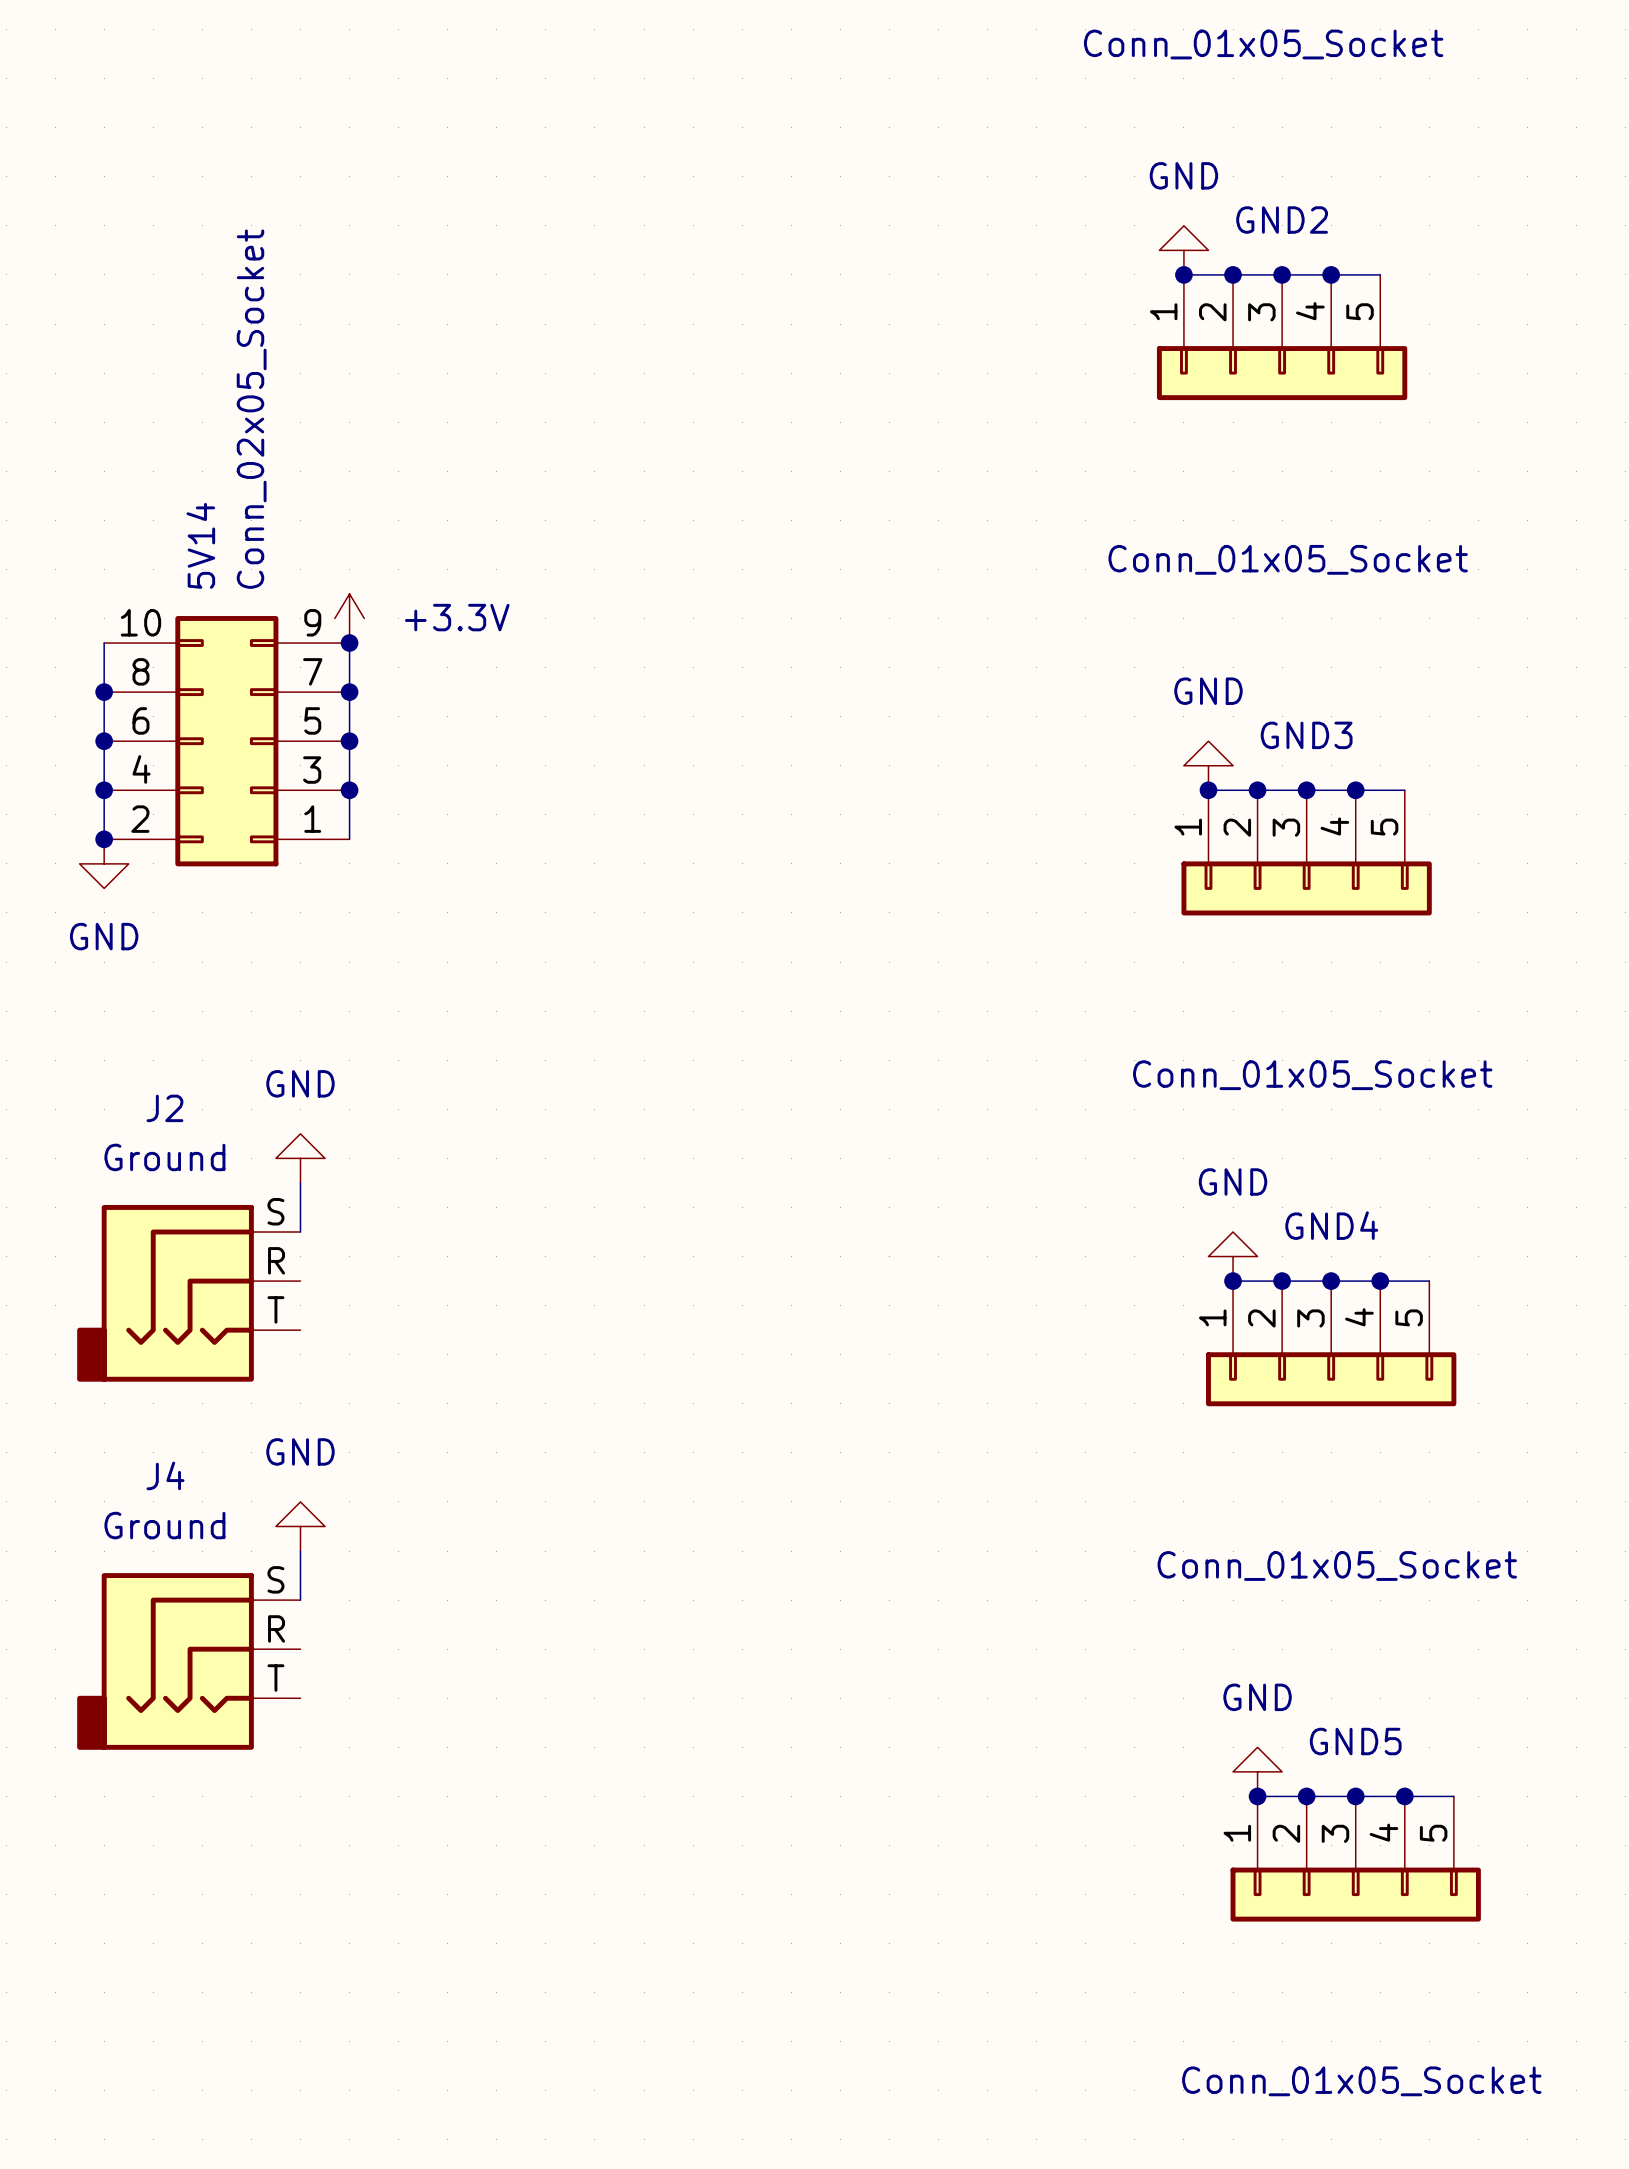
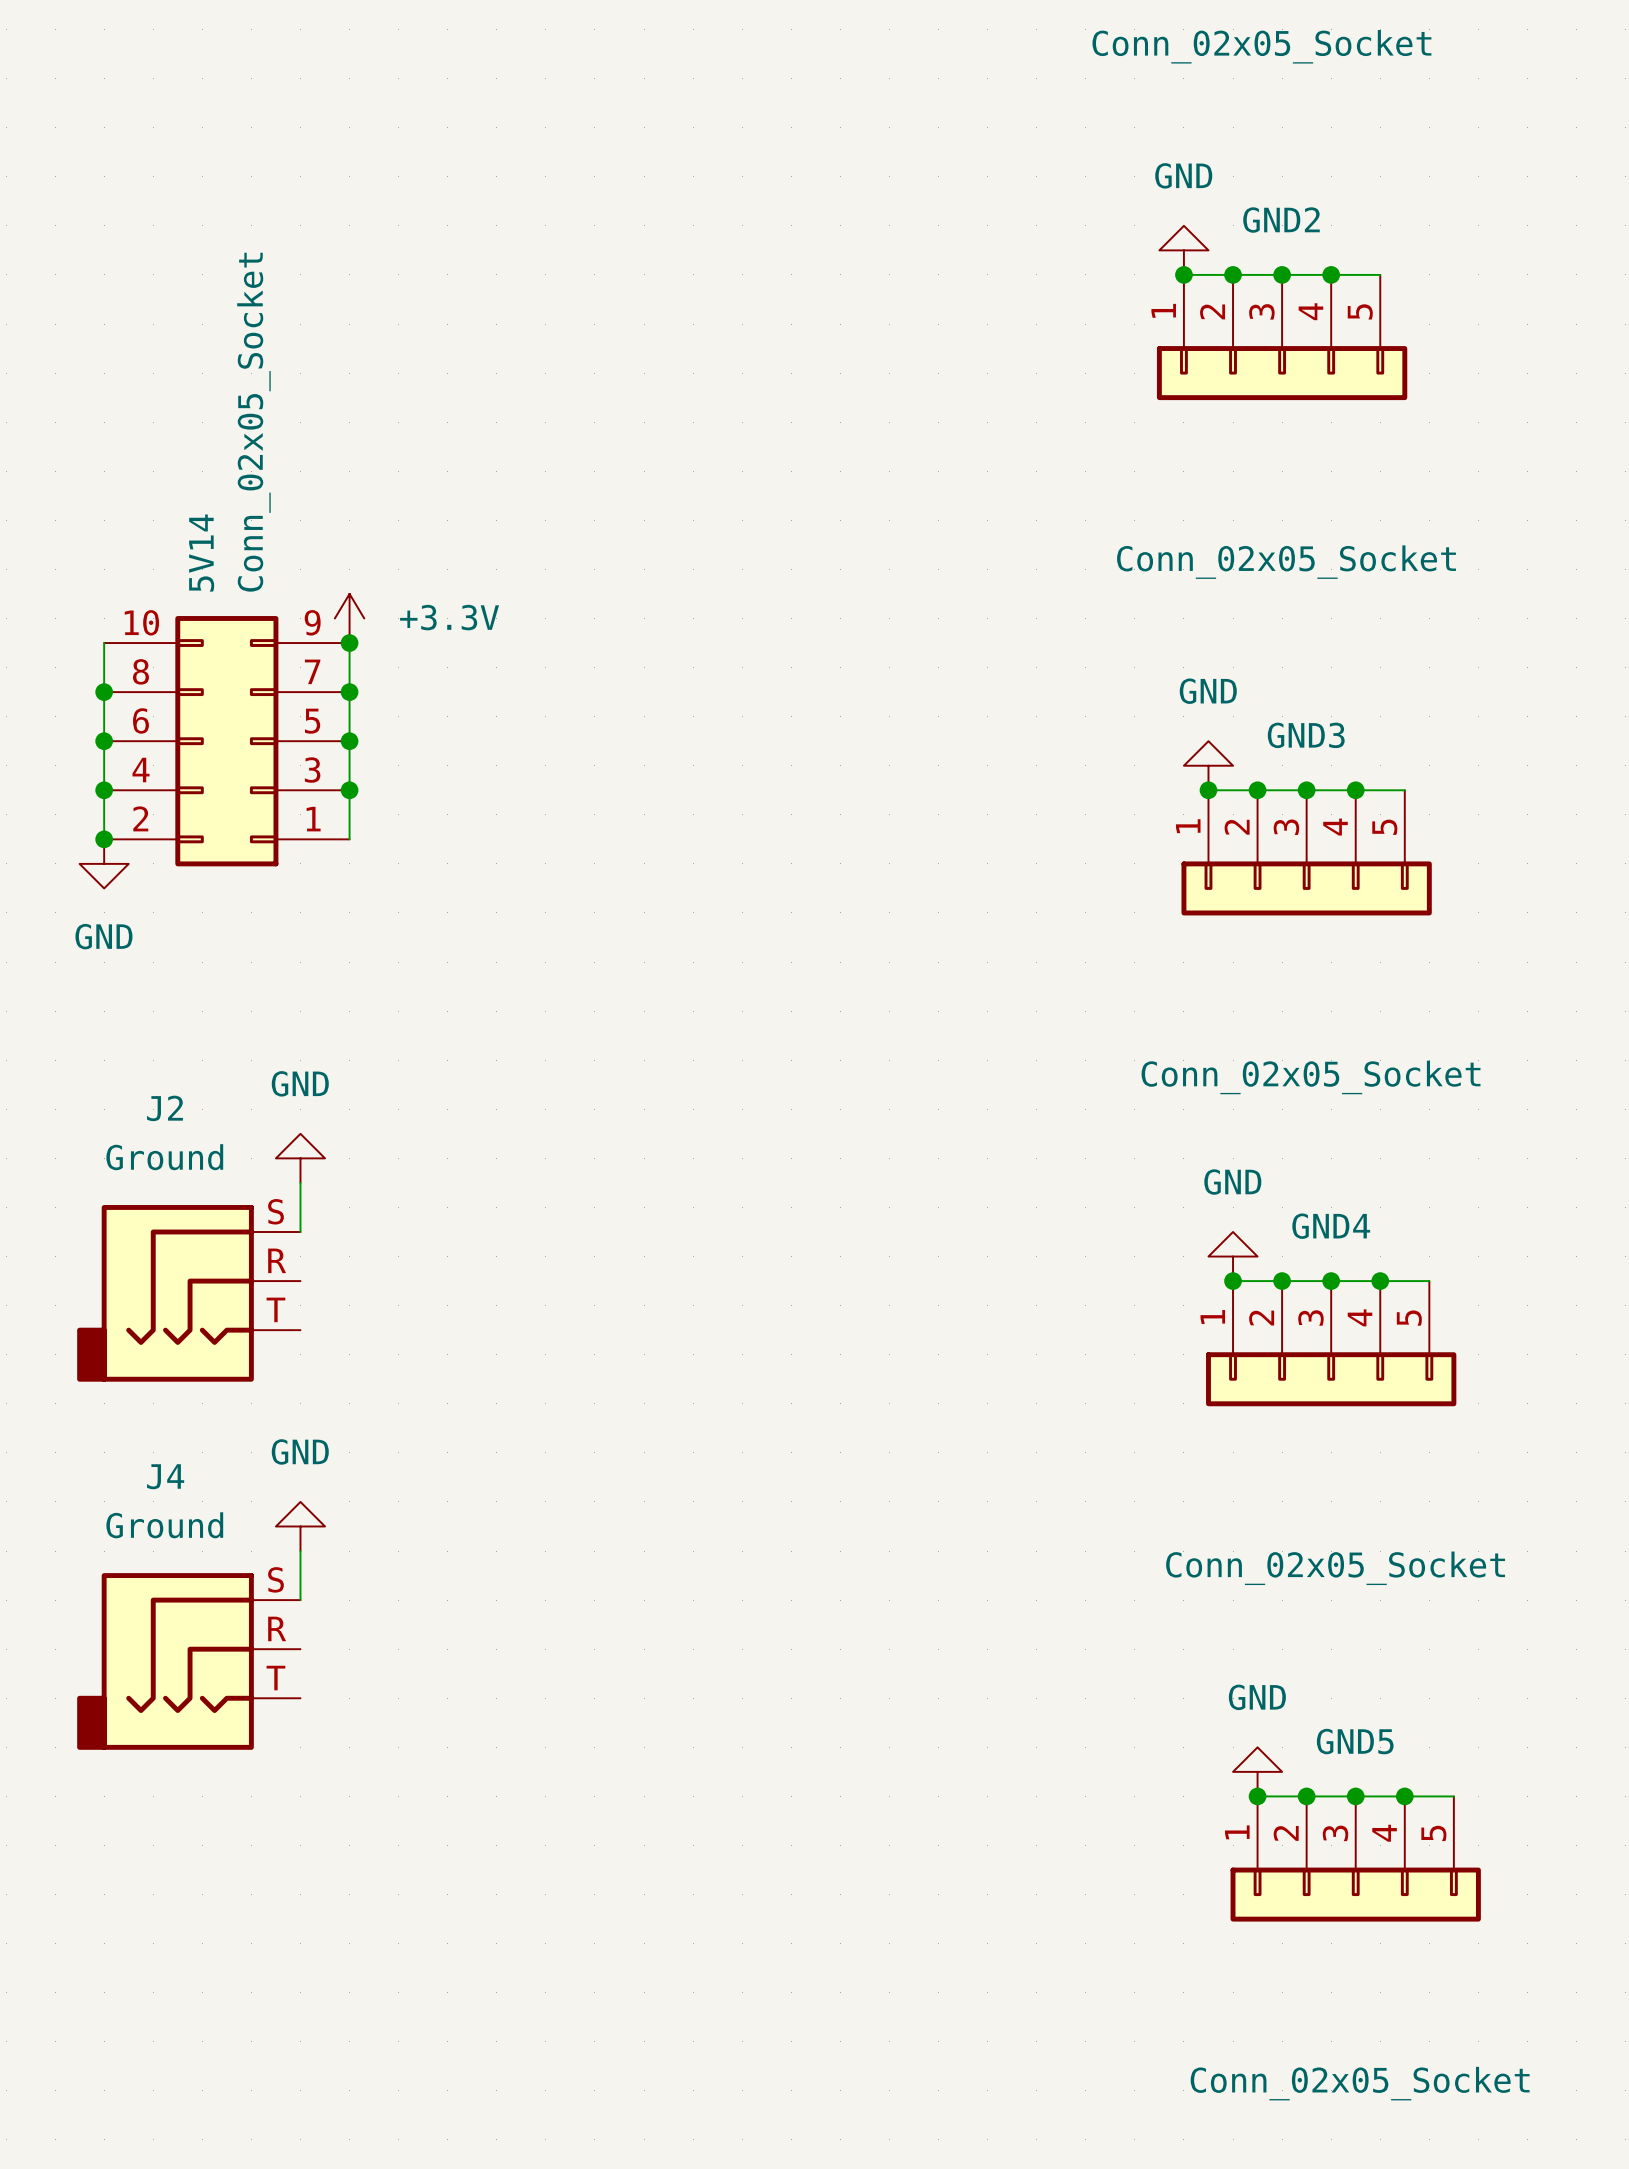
part value: Conn_01x05_Socket (1263, 44) -> Conn_02x05_Socket (1261, 46)
GND2 value: Conn_01x05_Socket (1288, 559) -> Conn_02x05_Socket (1286, 562)
GND3 value: Conn_01x05_Socket (1312, 1075) -> Conn_02x05_Socket (1311, 1077)
GND4 value: Conn_01x05_Socket (1337, 1566) -> Conn_02x05_Socket (1335, 1568)
GND5 value: Conn_01x05_Socket (1361, 2081) -> Conn_02x05_Socket (1360, 2083)

